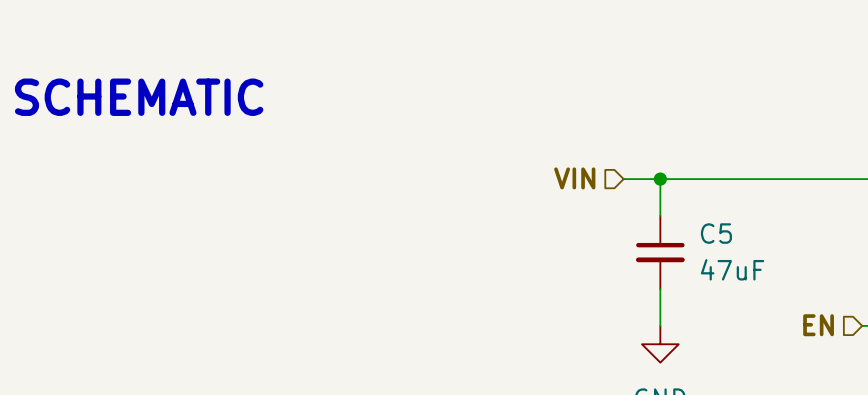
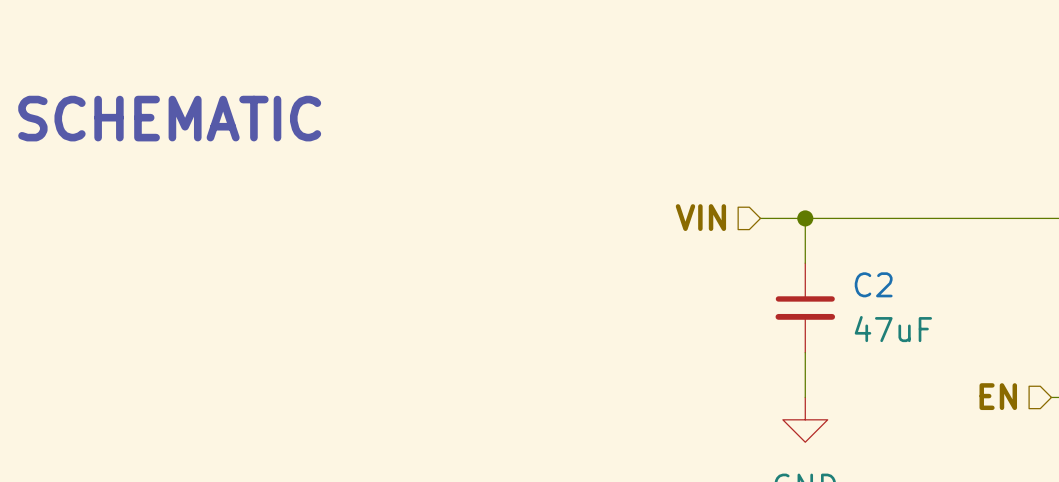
C5 name: C5 (716, 233) -> C2 (873, 284)

